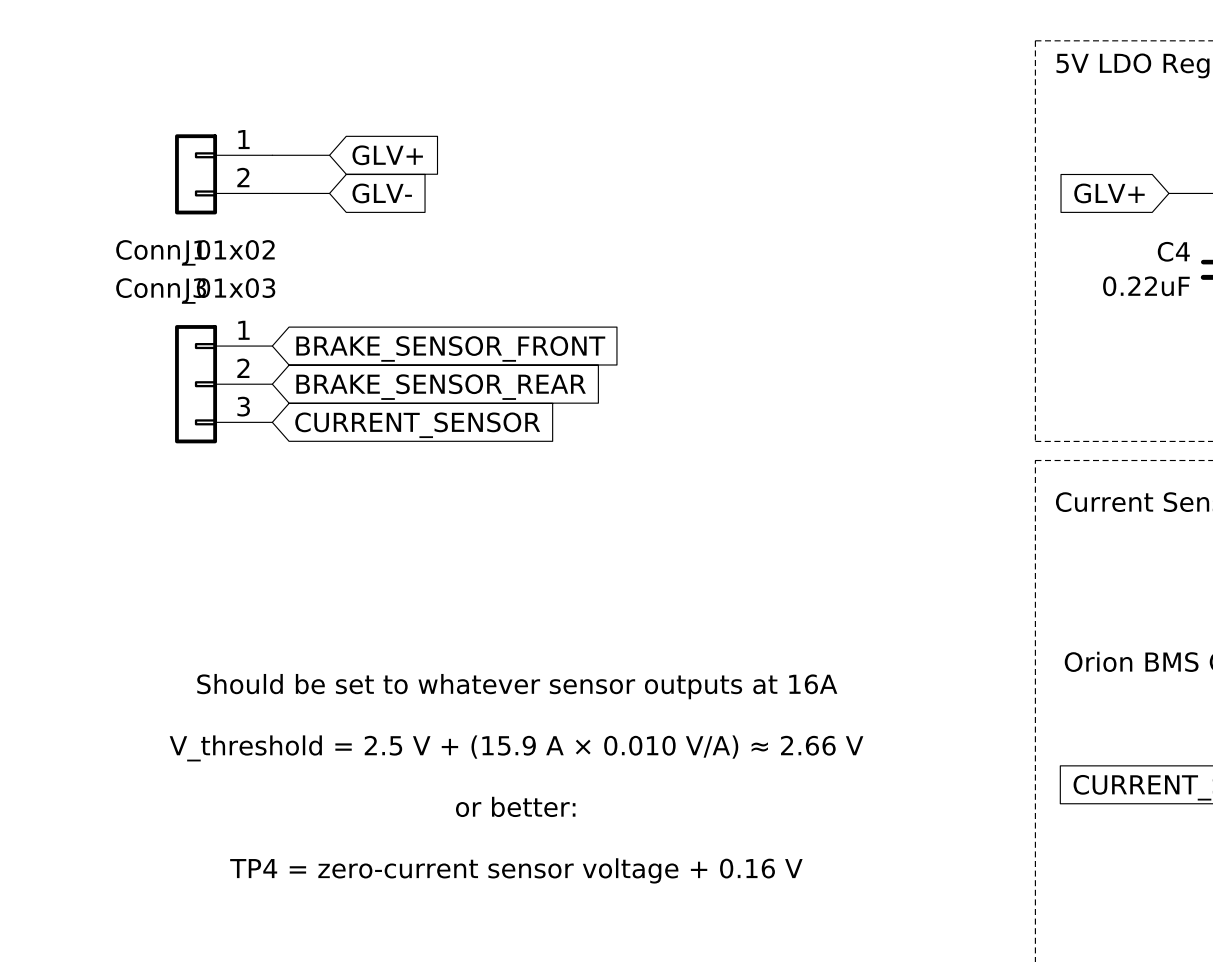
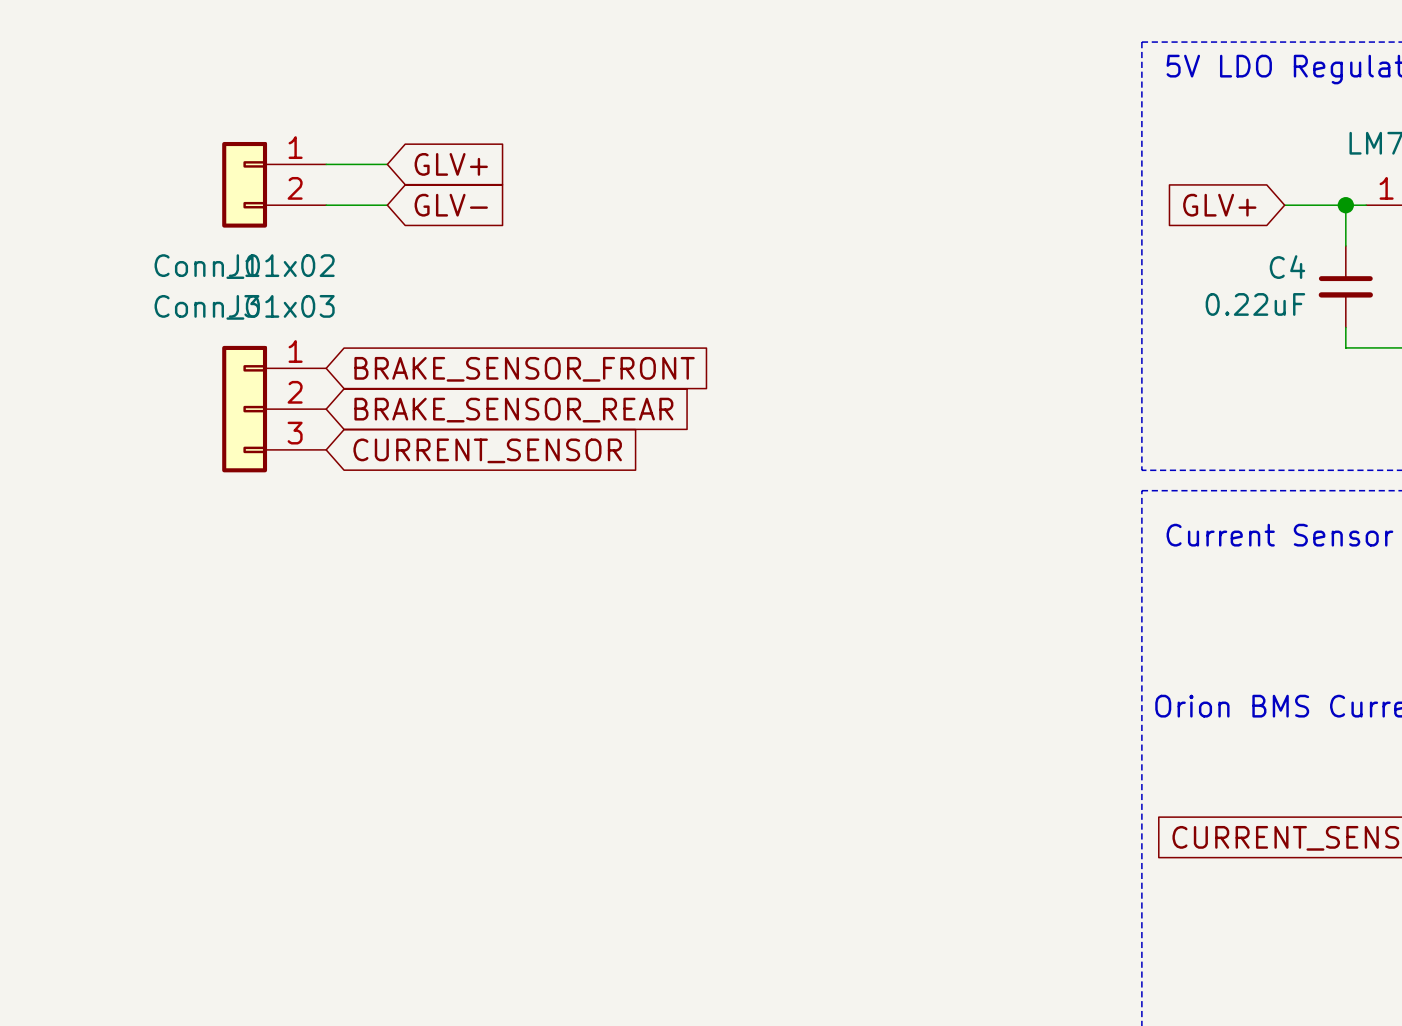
text: Should be set to whatever sensor outputs at 16A (517, 686) -> none
text: V_threshold = 2.5 V + (15.9 A × 0.010 V/A) ≈ 2.66 V (516, 748) -> none
text: or better: (515, 806) -> none
text: TP4 = zero-current sensor voltage + 0.16 V (516, 870) -> none

